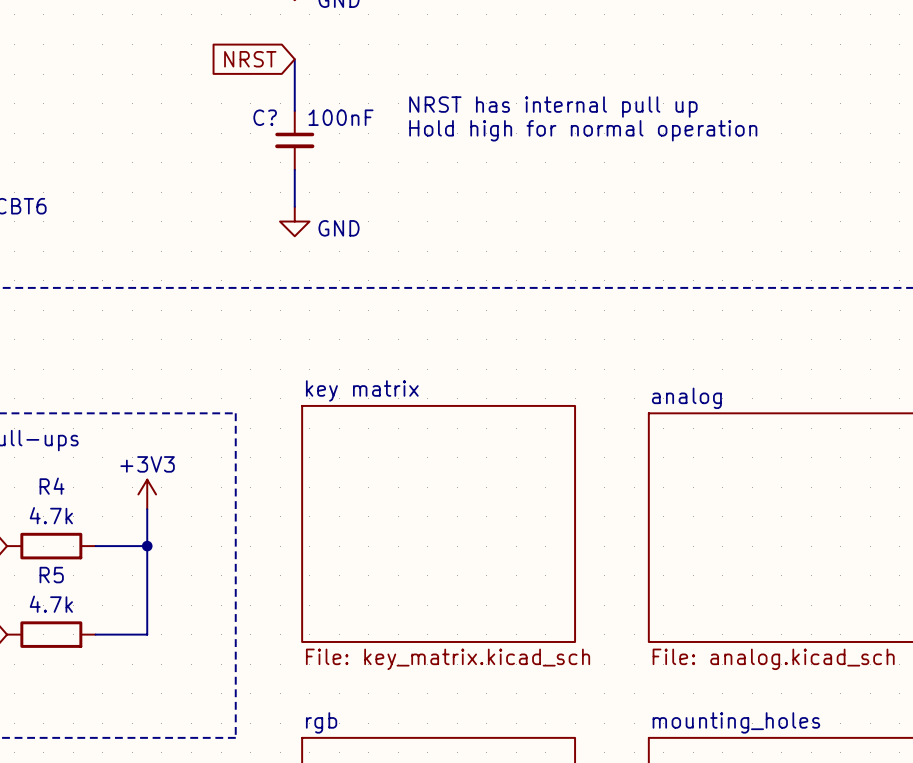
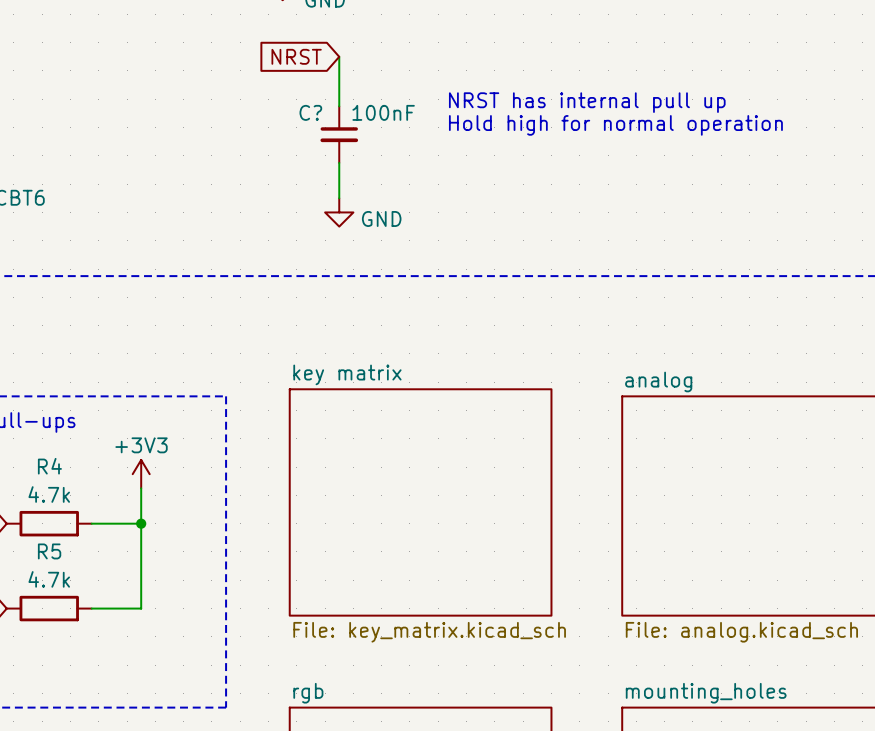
global label position: NRST (250, 59) -> NRST (296, 56)
wire: (294, 59) (294, 110) -> (339, 56) (339, 106)
text position: NRST has internal pull up (553, 107) -> NRST has internal pull up (587, 102)
text position: Hold high for normal operation (583, 130) -> Hold high for normal operation (615, 125)
C? position: (294, 140) -> (339, 134)
wire: (294, 169) (294, 206) -> (339, 162) (339, 198)
power symbol position: GND (294, 221) -> GND (339, 212)

